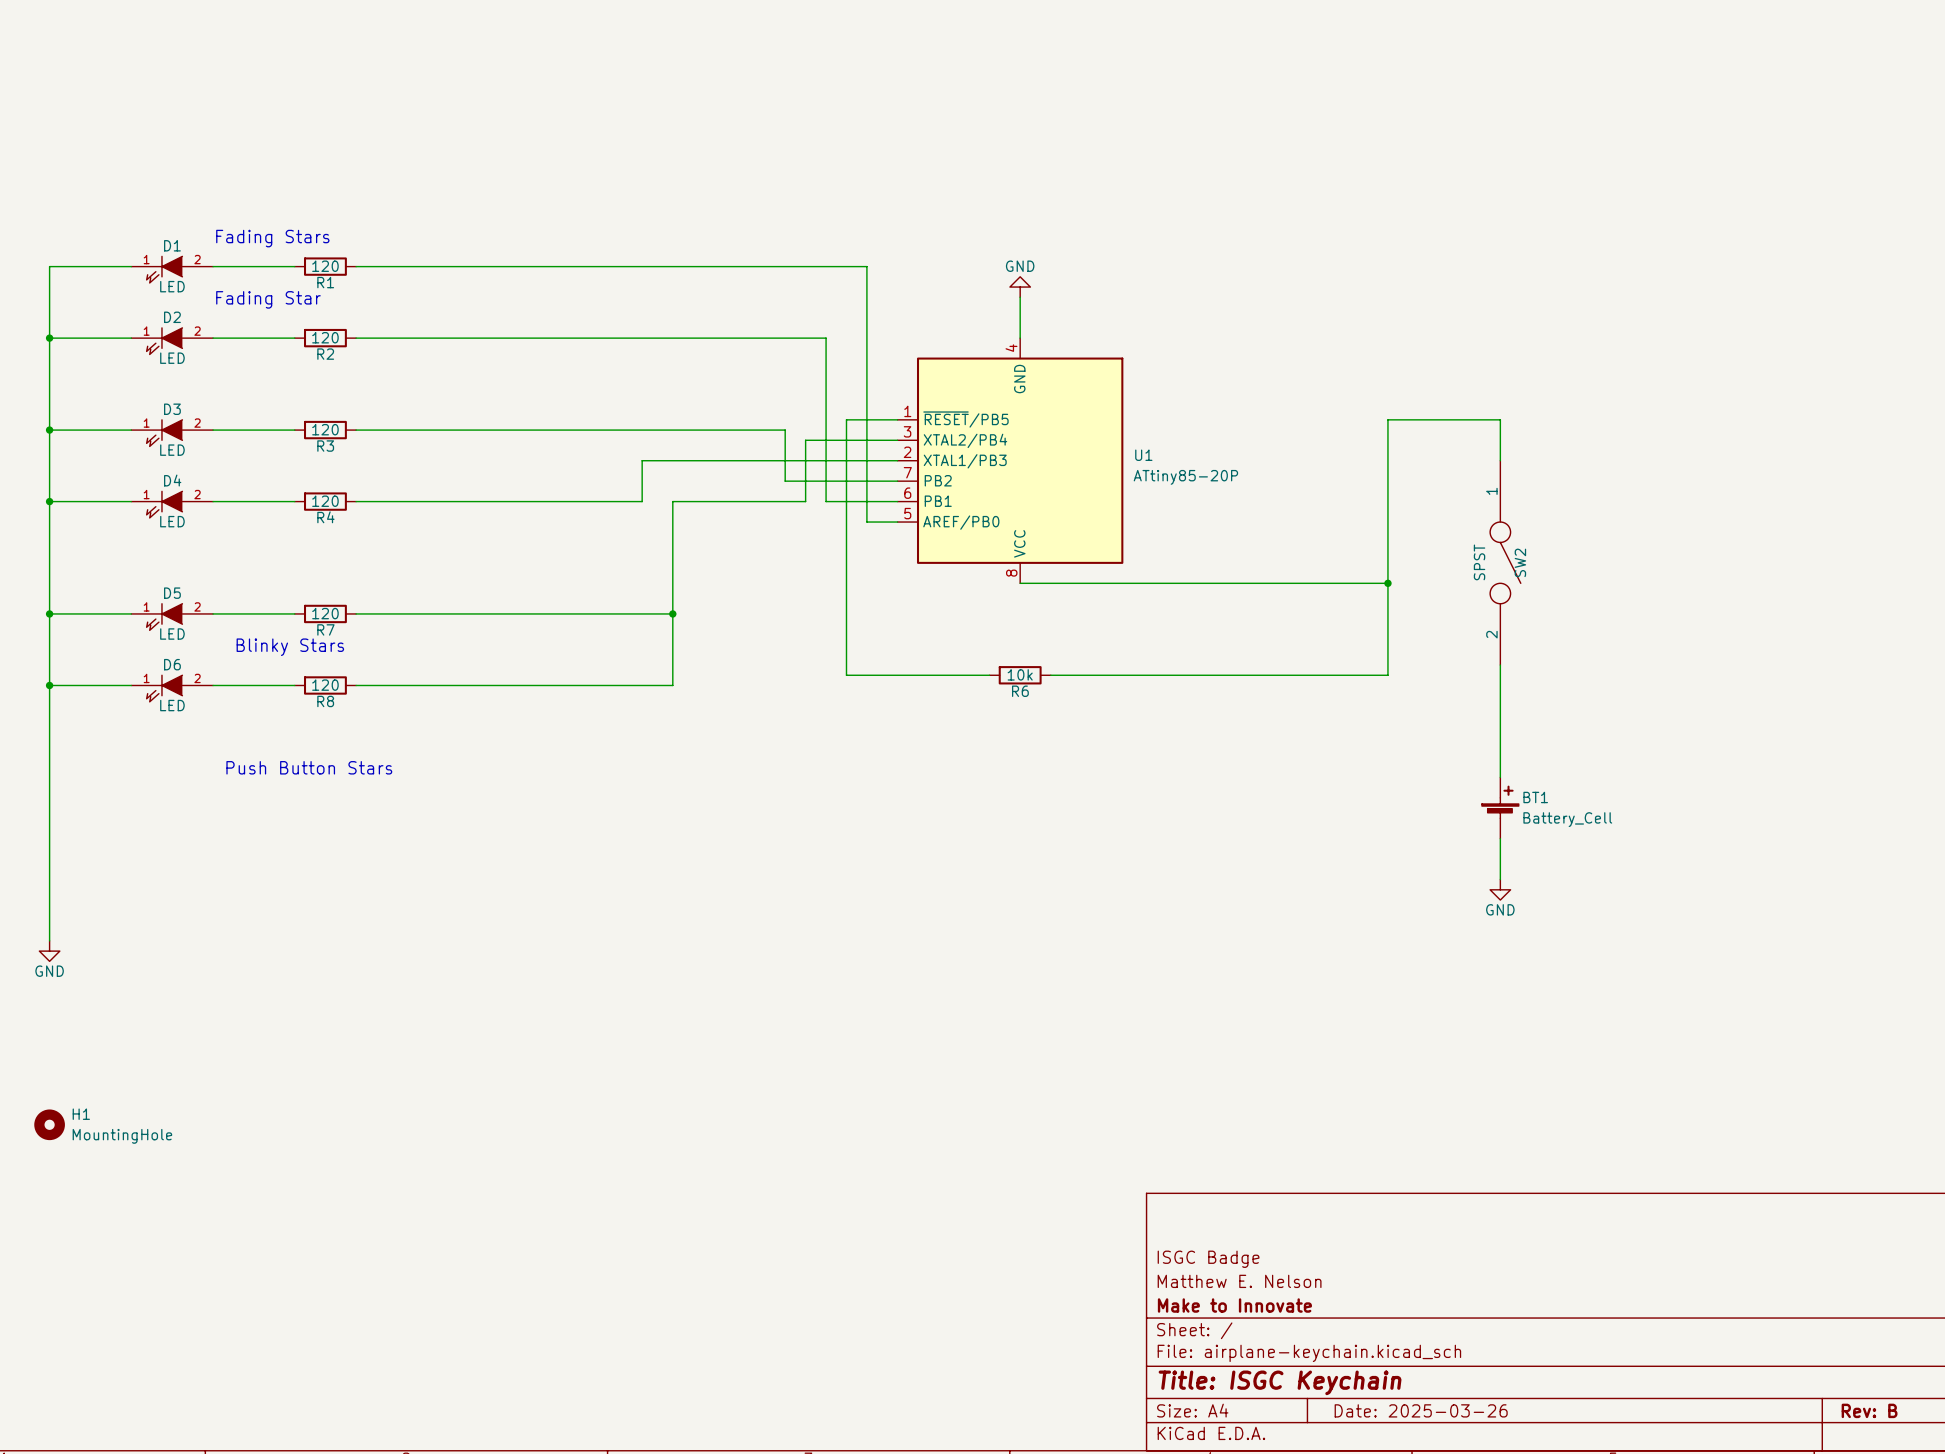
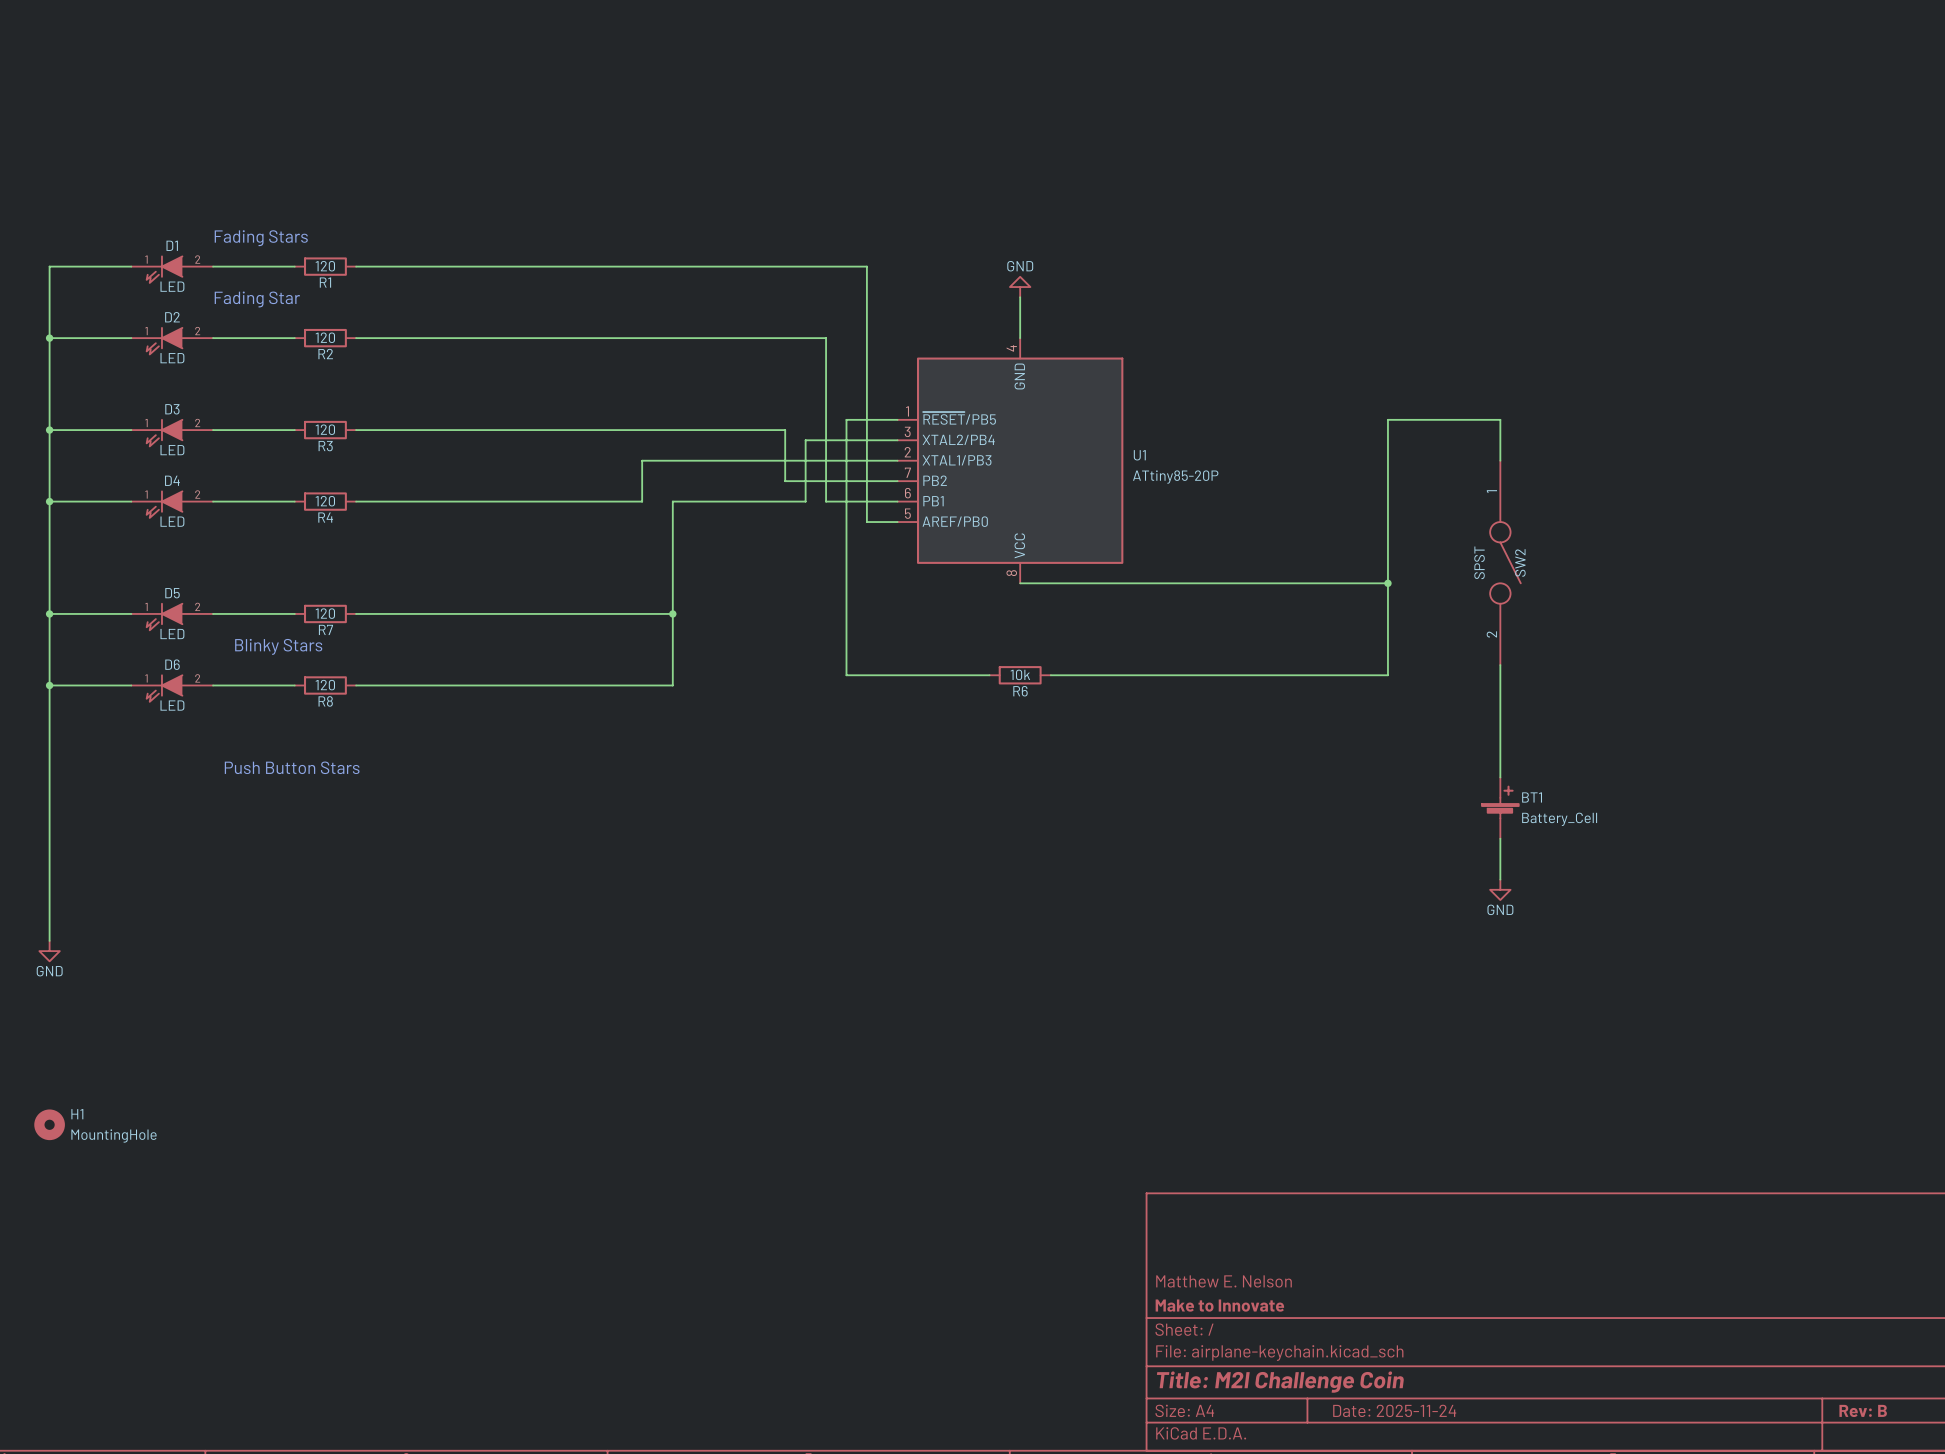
title block: ISGC Badge (1208, 1259) -> none
title block: Title: ISGC Keychain (1280, 1382) -> Title: M2I Challenge Coin (1280, 1382)
title block: Date: 2025-03-26 (1421, 1410) -> Date: 2025-11-24 (1394, 1410)

